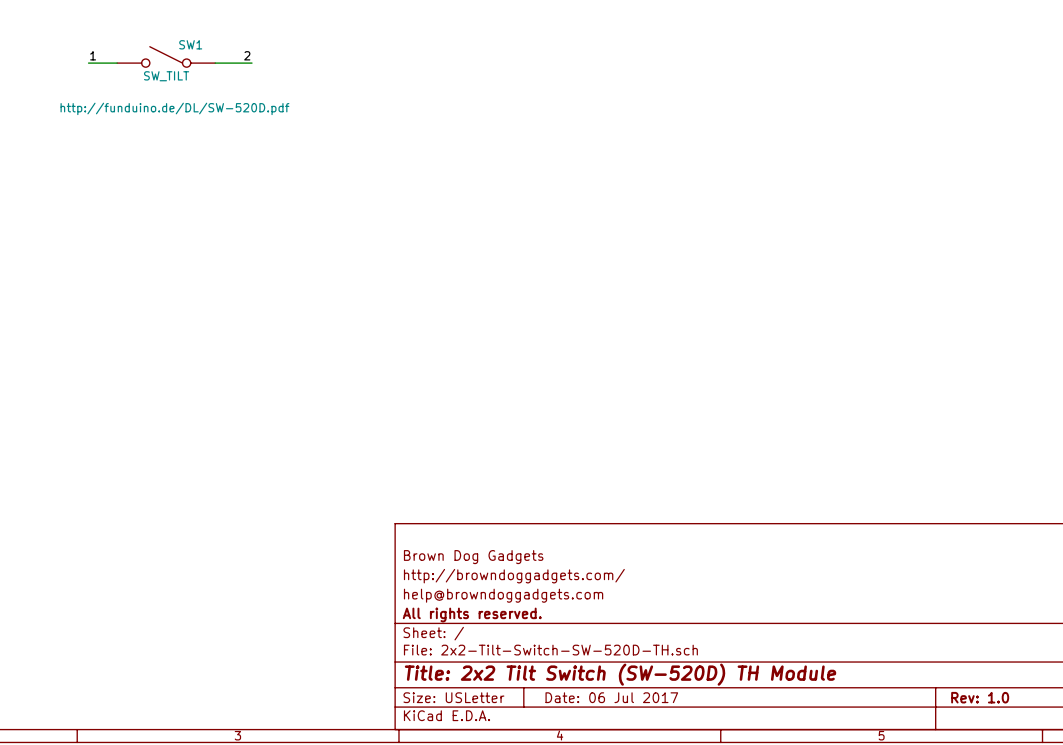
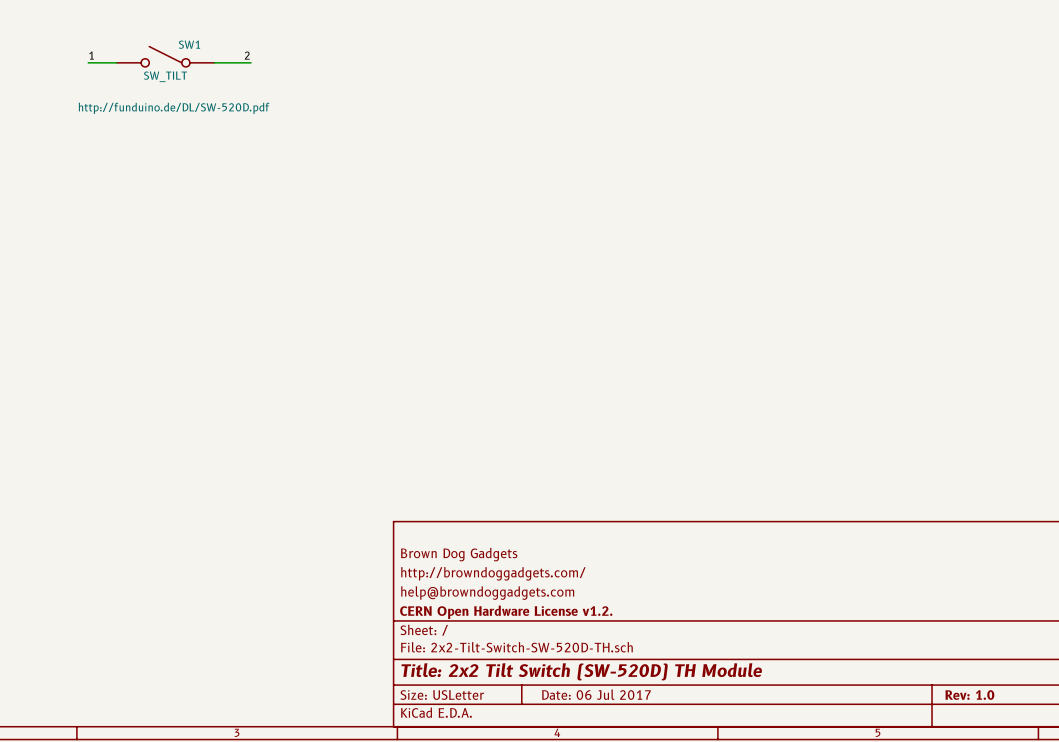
title block: All rights reserved. (472, 615) -> CERN Open Hardware License v1.2. (506, 612)

